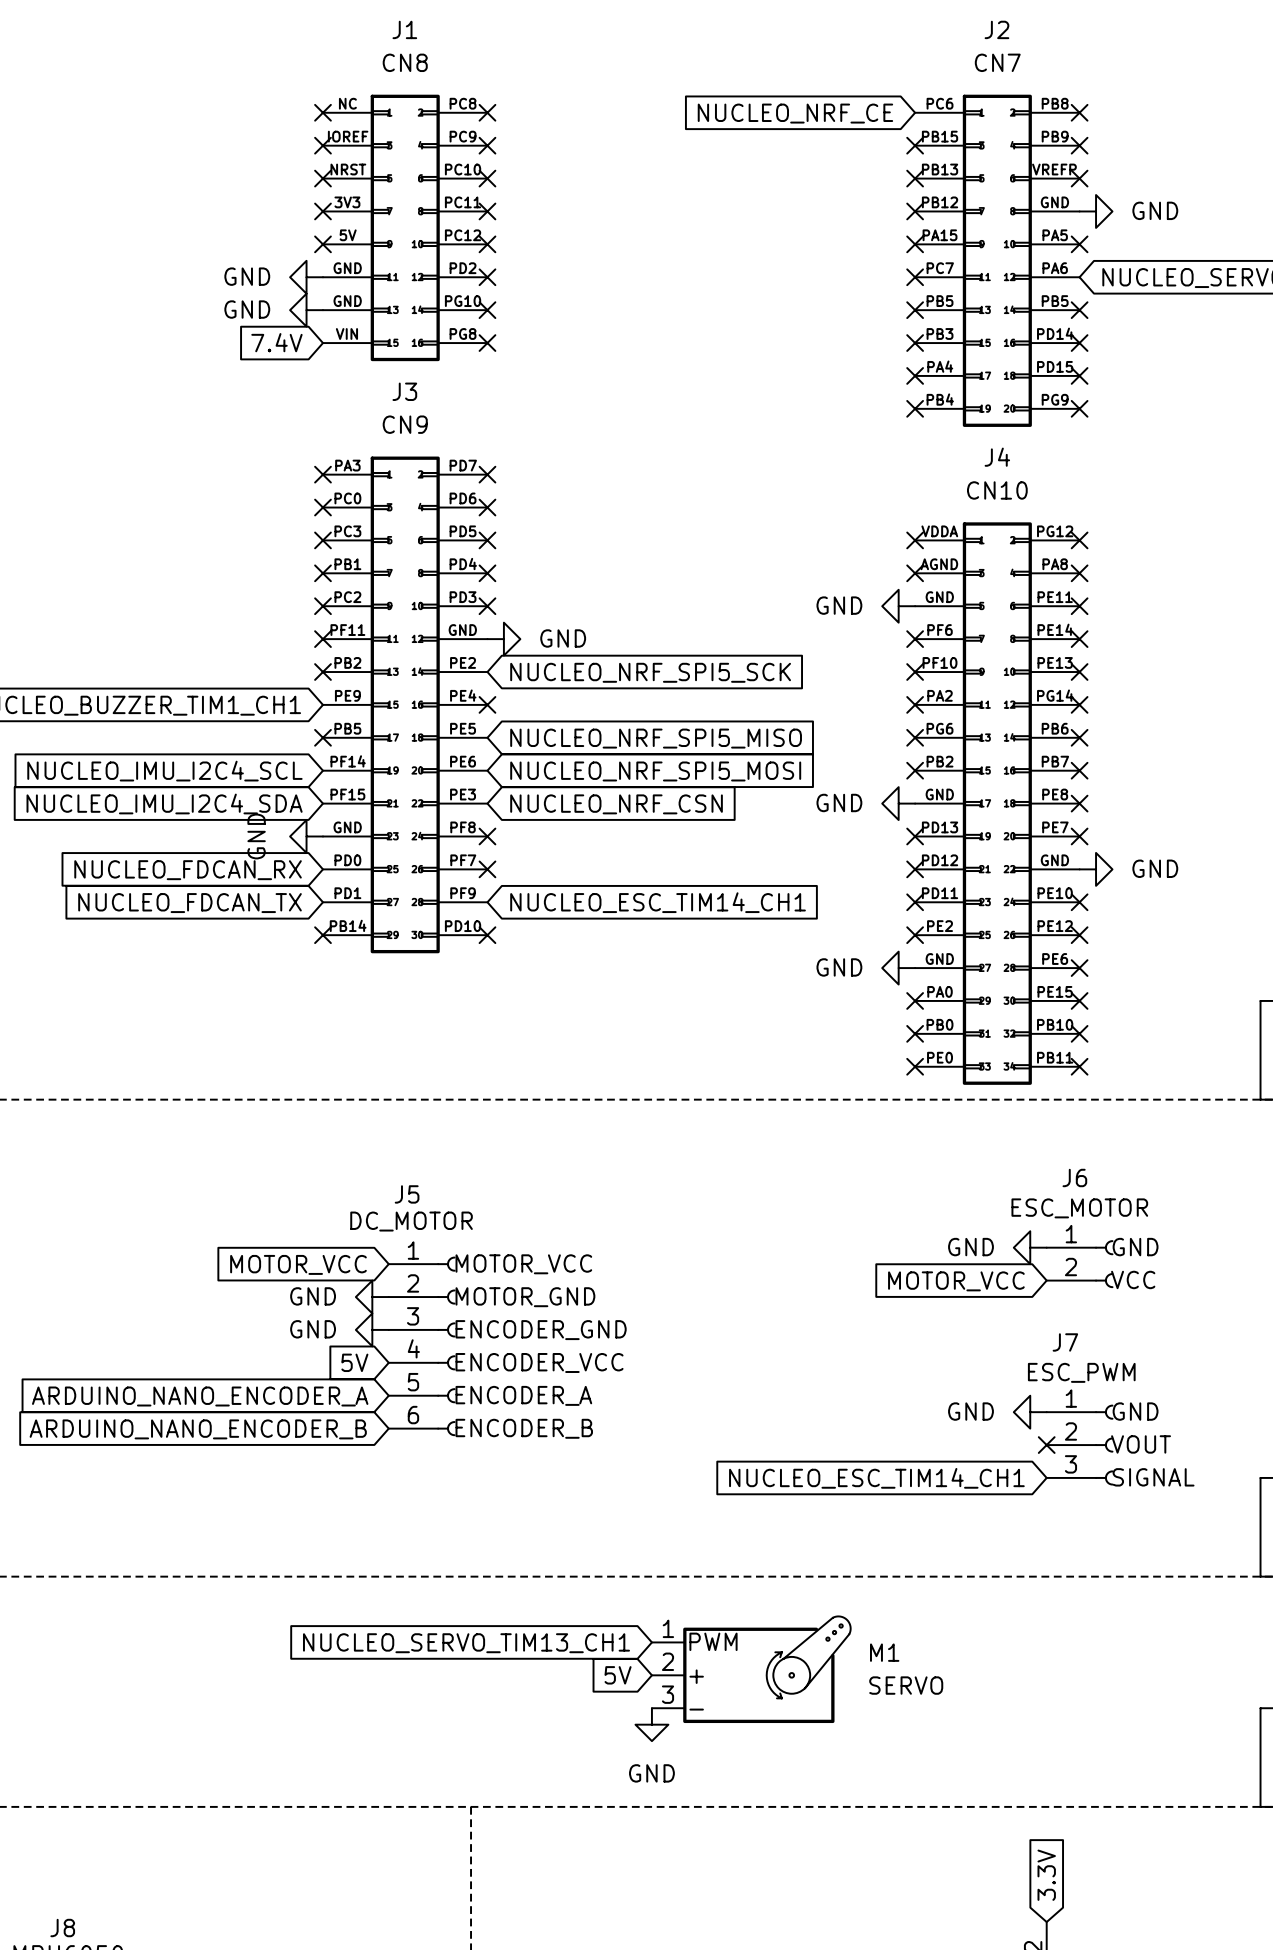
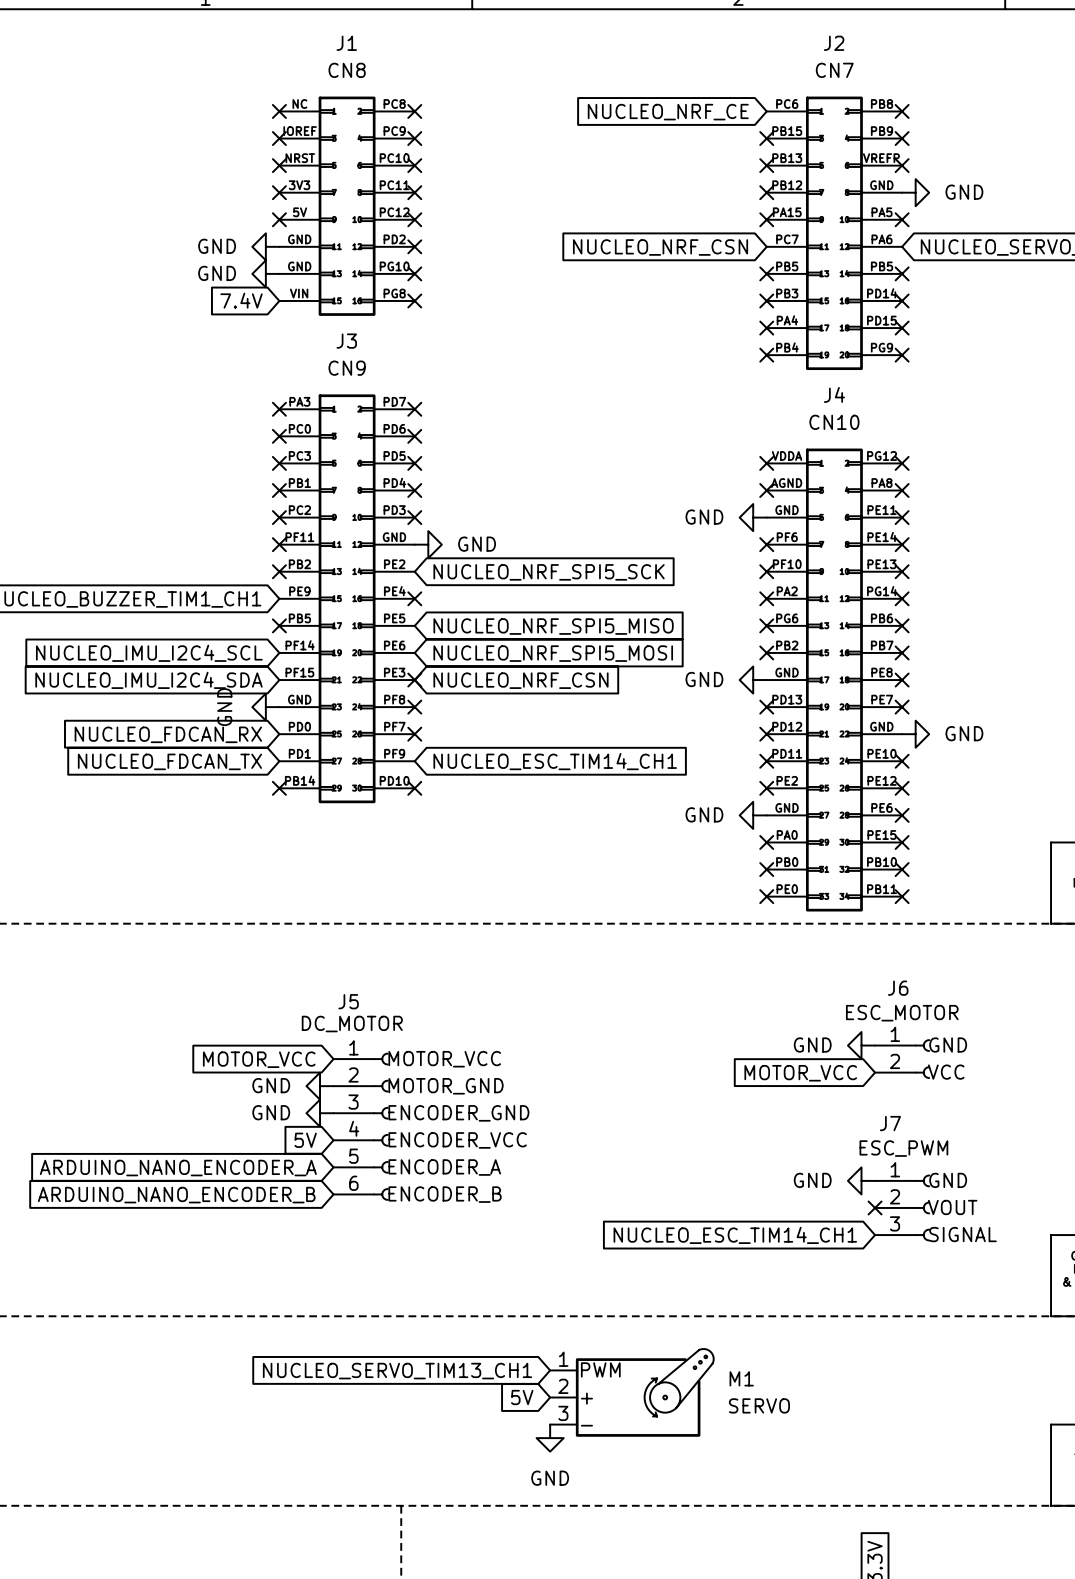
no-connect mark: (915, 277) -> none
global label: none -> NUCLEO_NRF_CSN (660, 247)
no-connect mark: none -> (414, 680)

